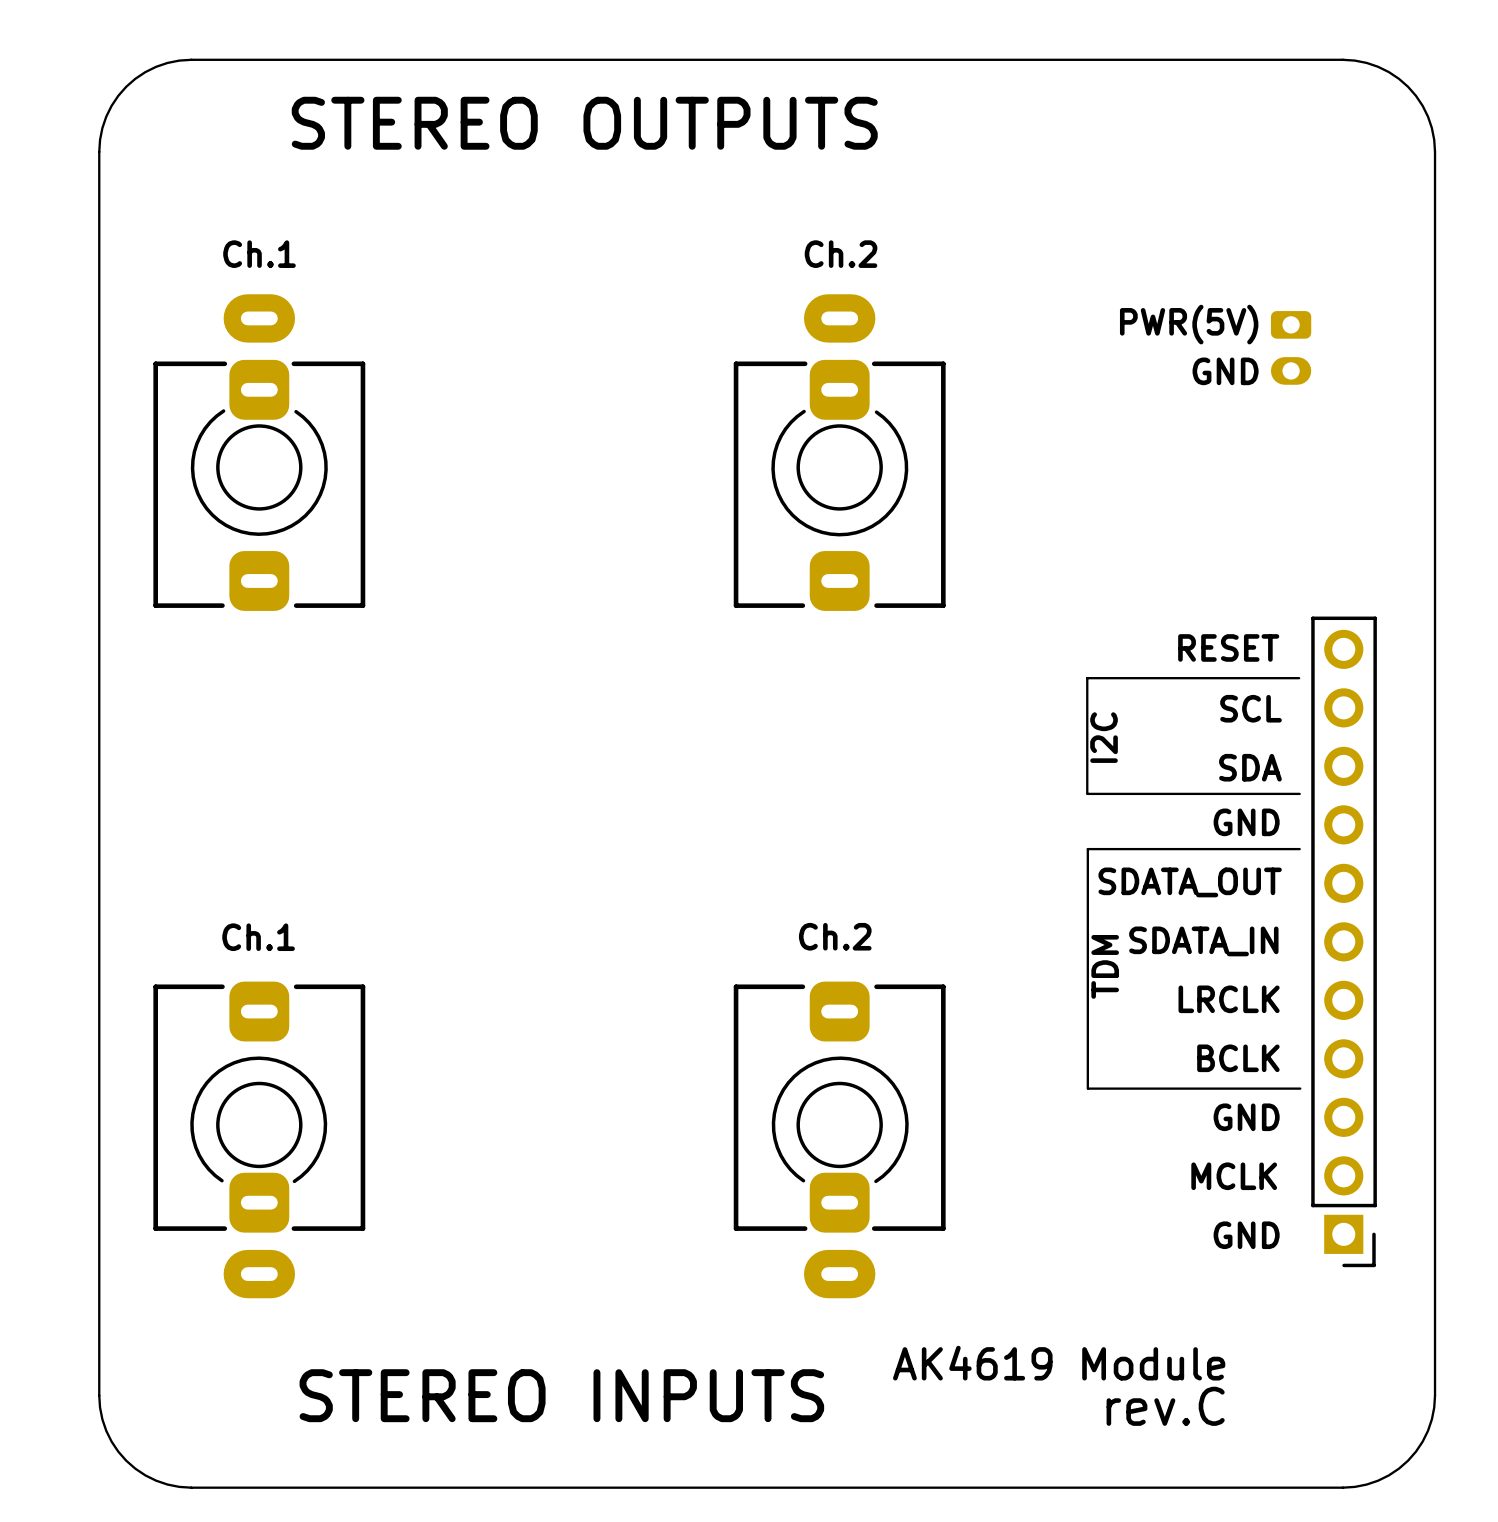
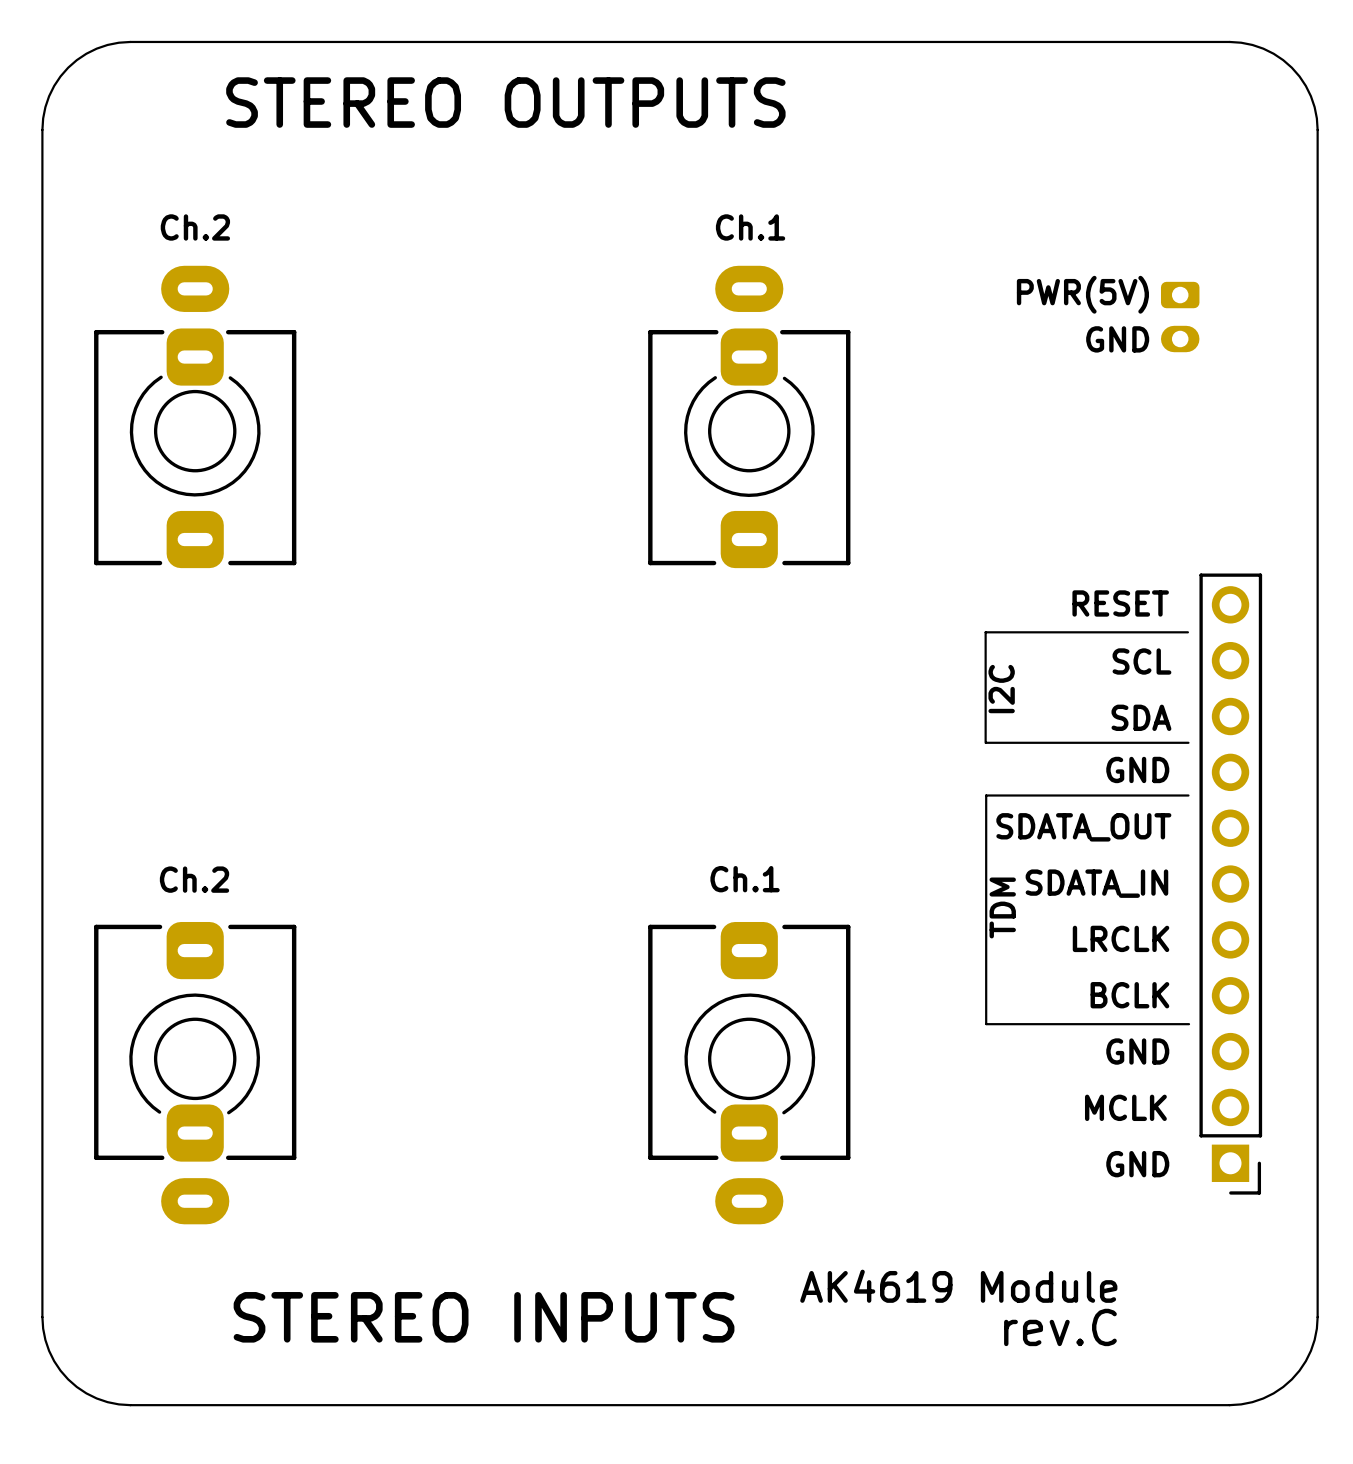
text: Ch.1 (259, 254) -> Ch.2 (195, 227)
text: Ch.2 (841, 254) -> Ch.1 (750, 227)
text: Ch.2 (835, 936) -> Ch.1 (745, 879)
text: Ch.1 (258, 937) -> Ch.2 (194, 879)

